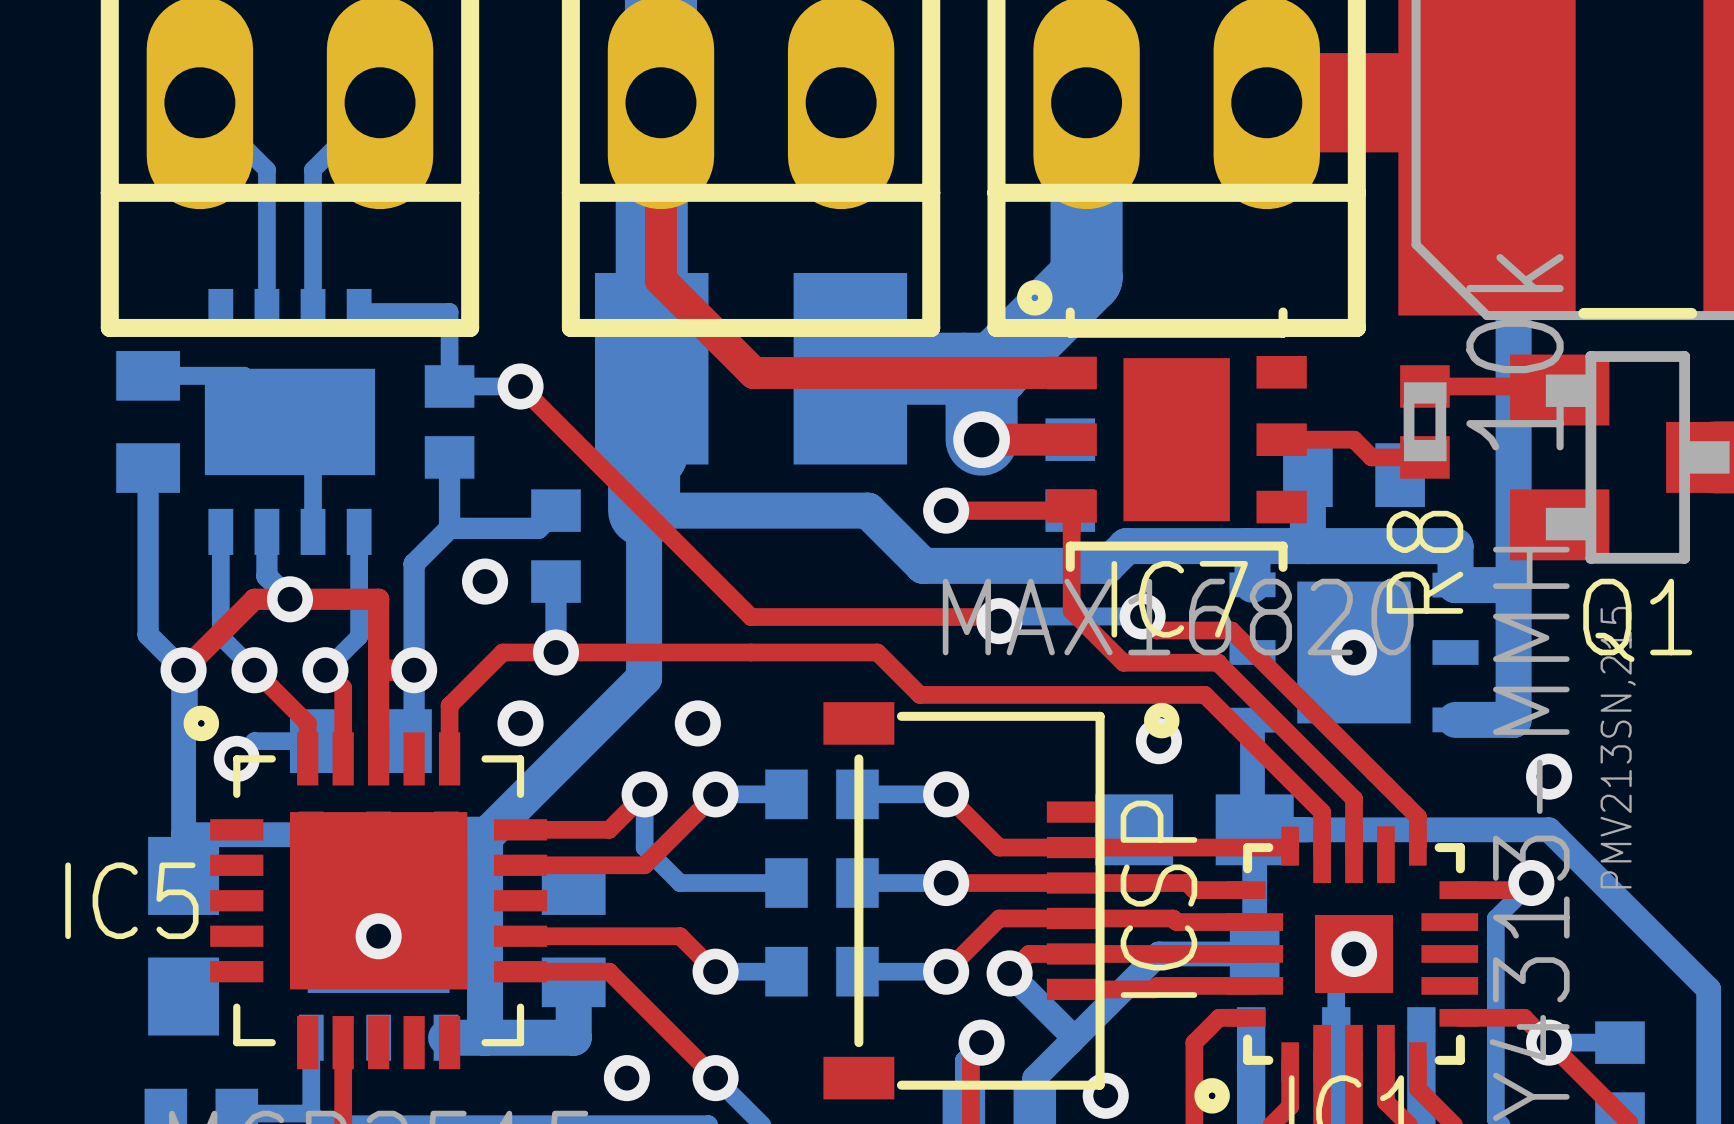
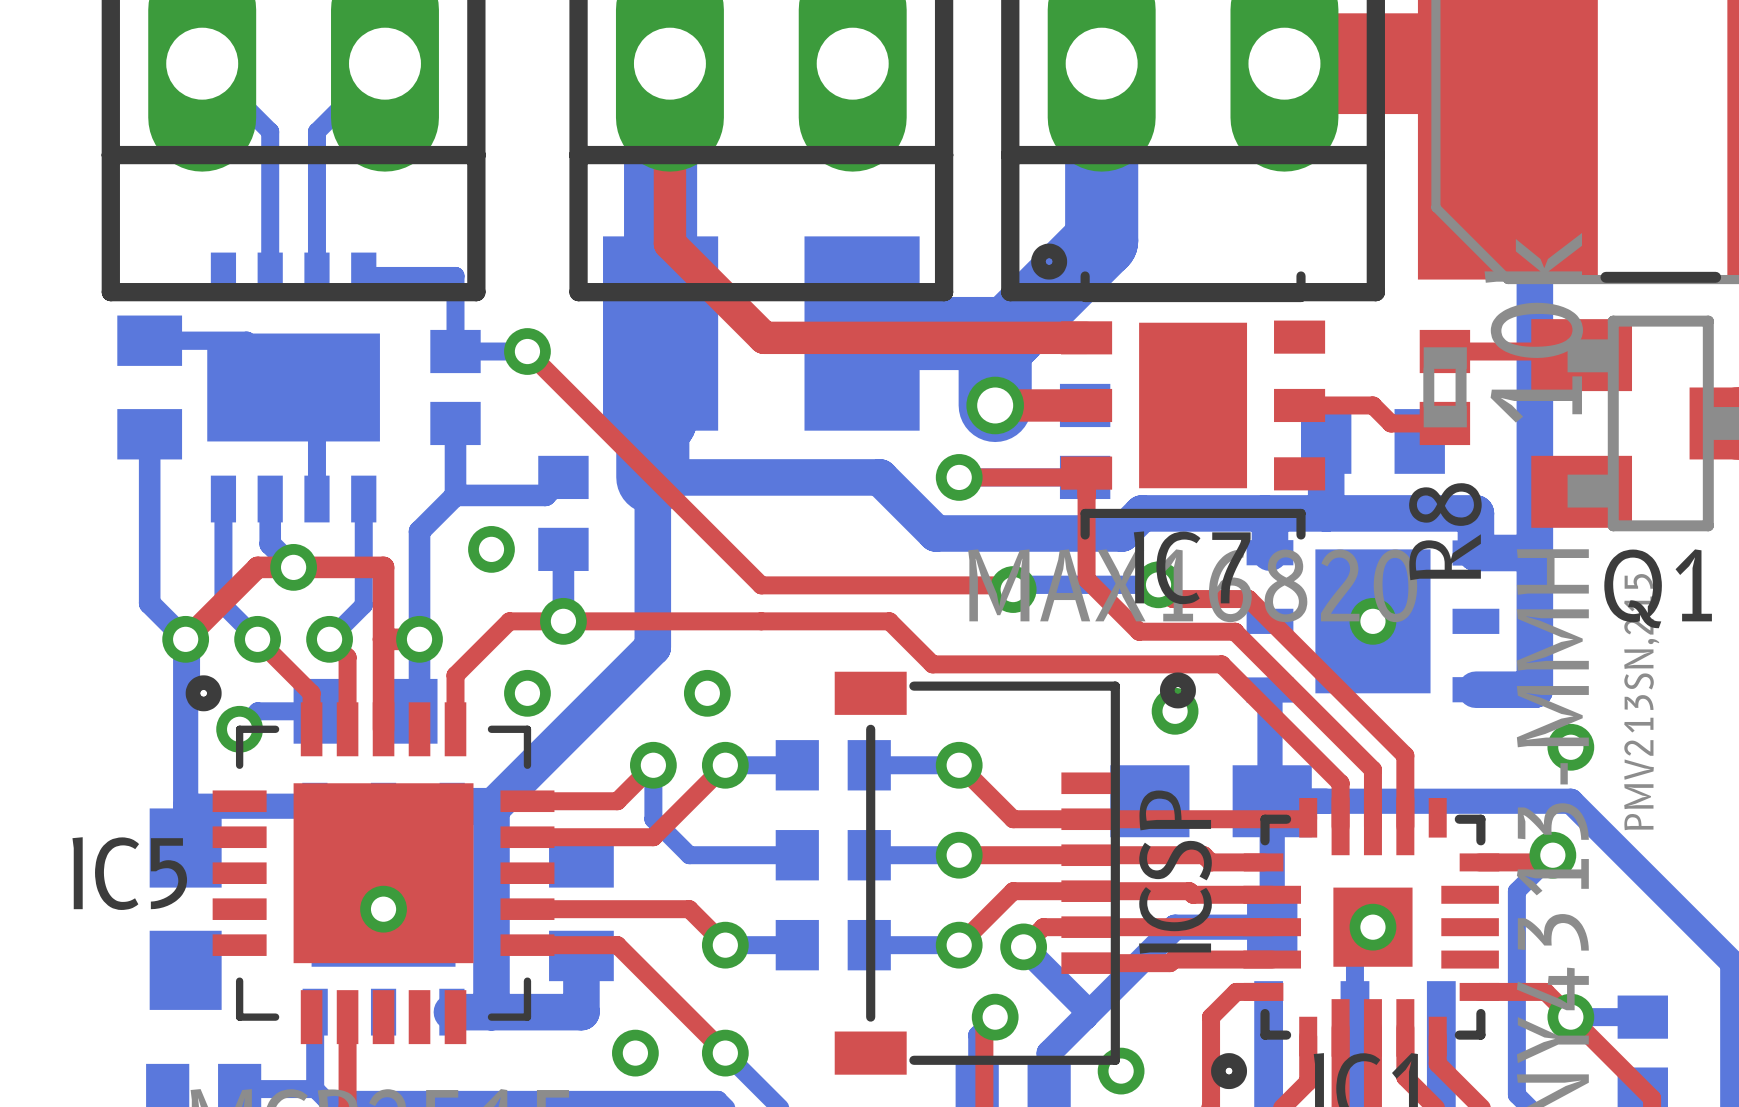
top track: (1385, 784) (1417, 816) (1417, 846) -> (1405, 755) (1405, 826)

